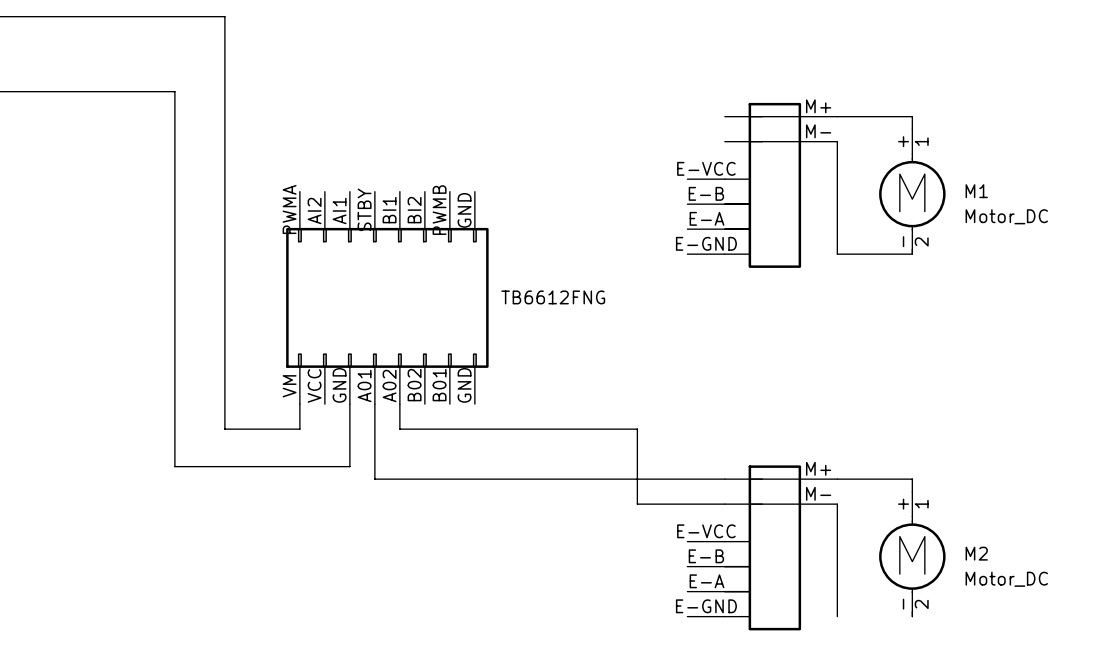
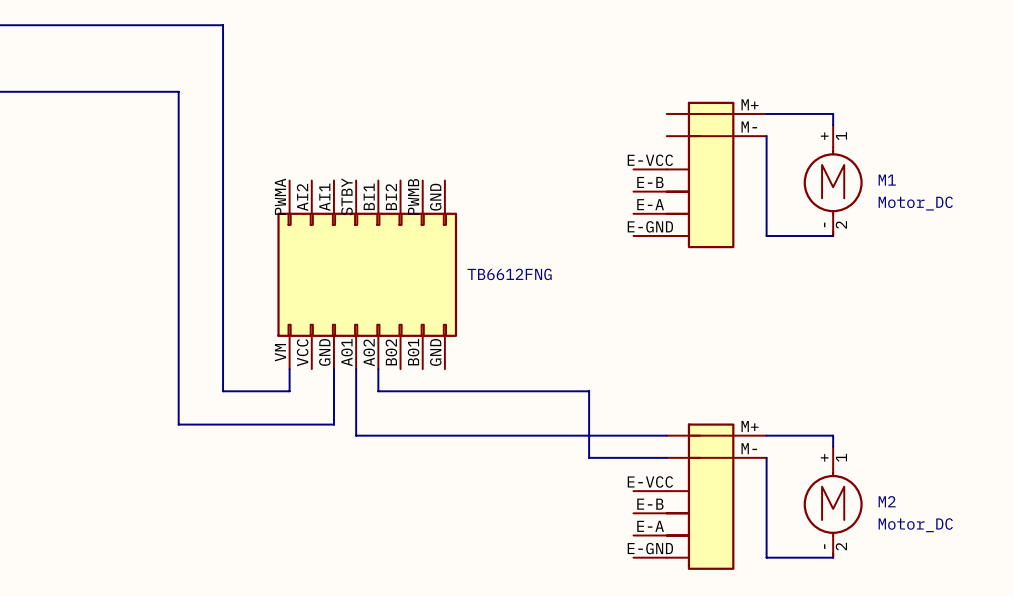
wire: none -> (766, 557) (833, 557)

